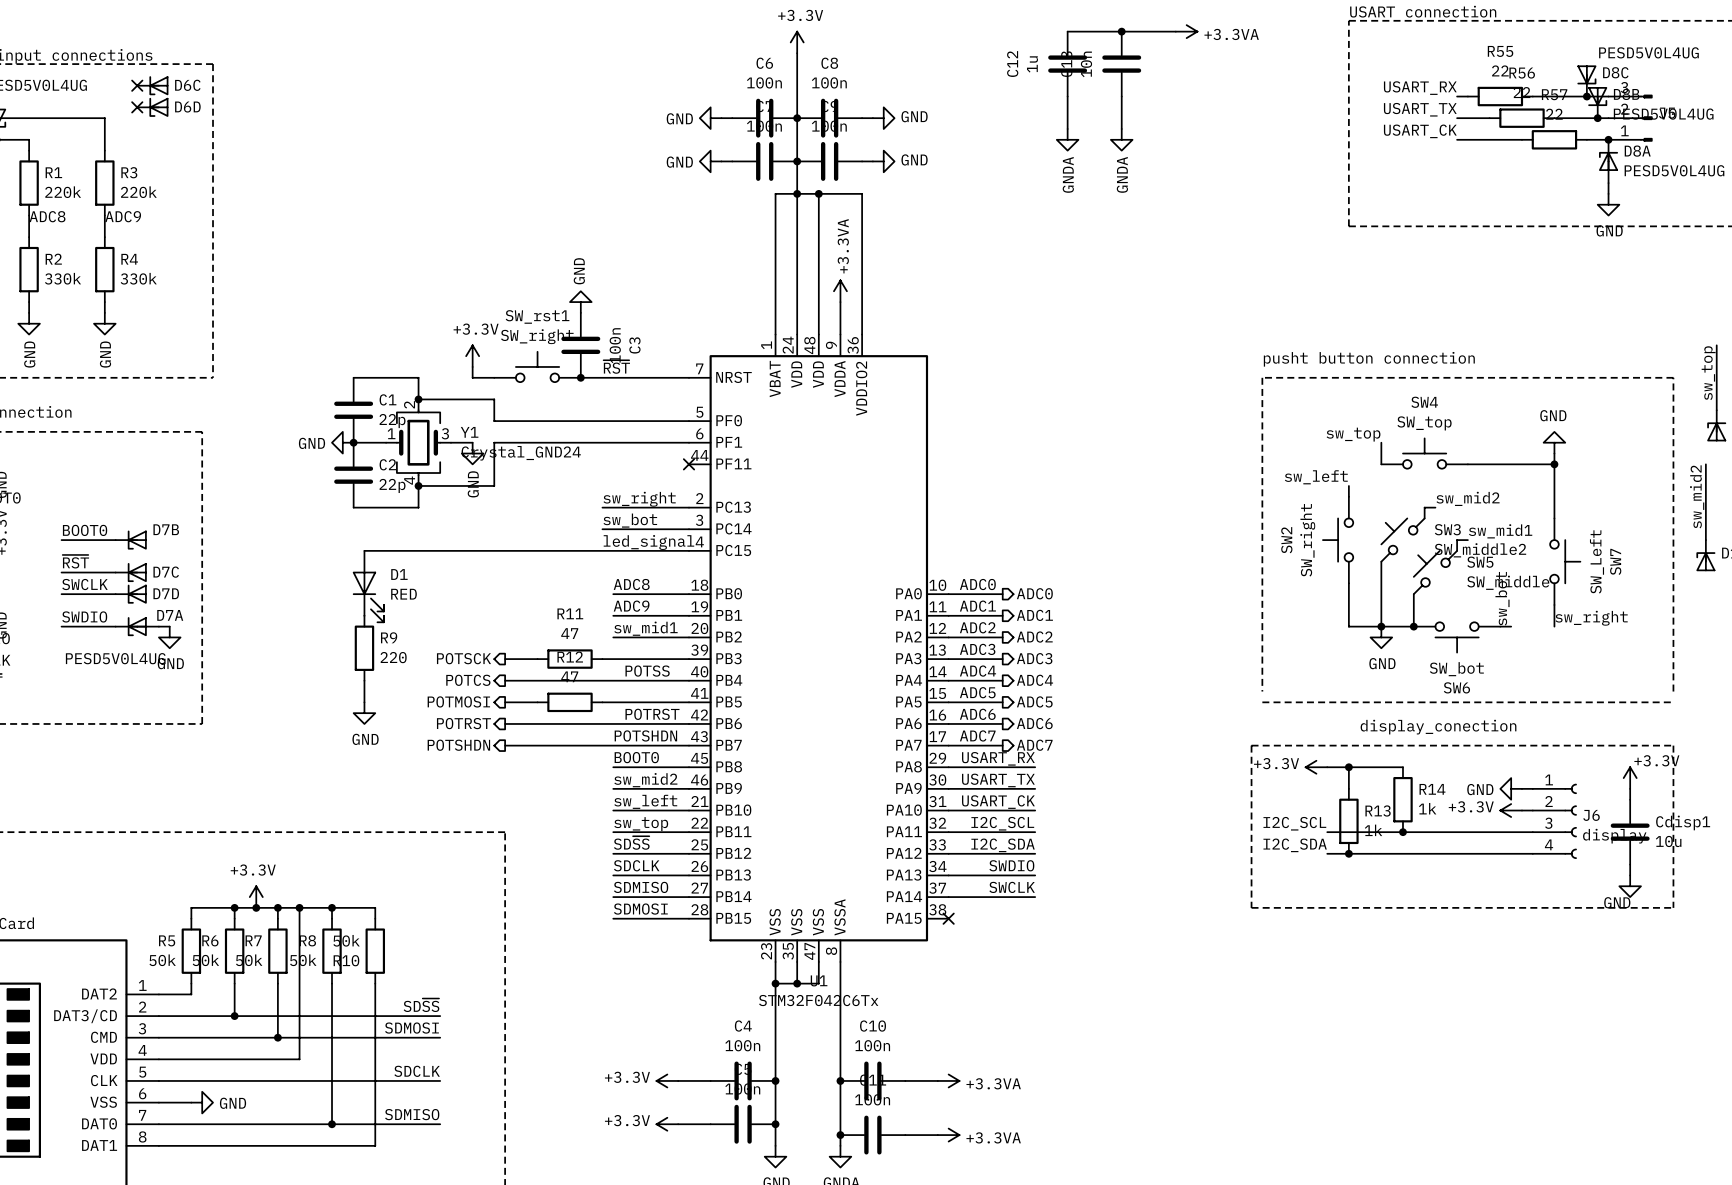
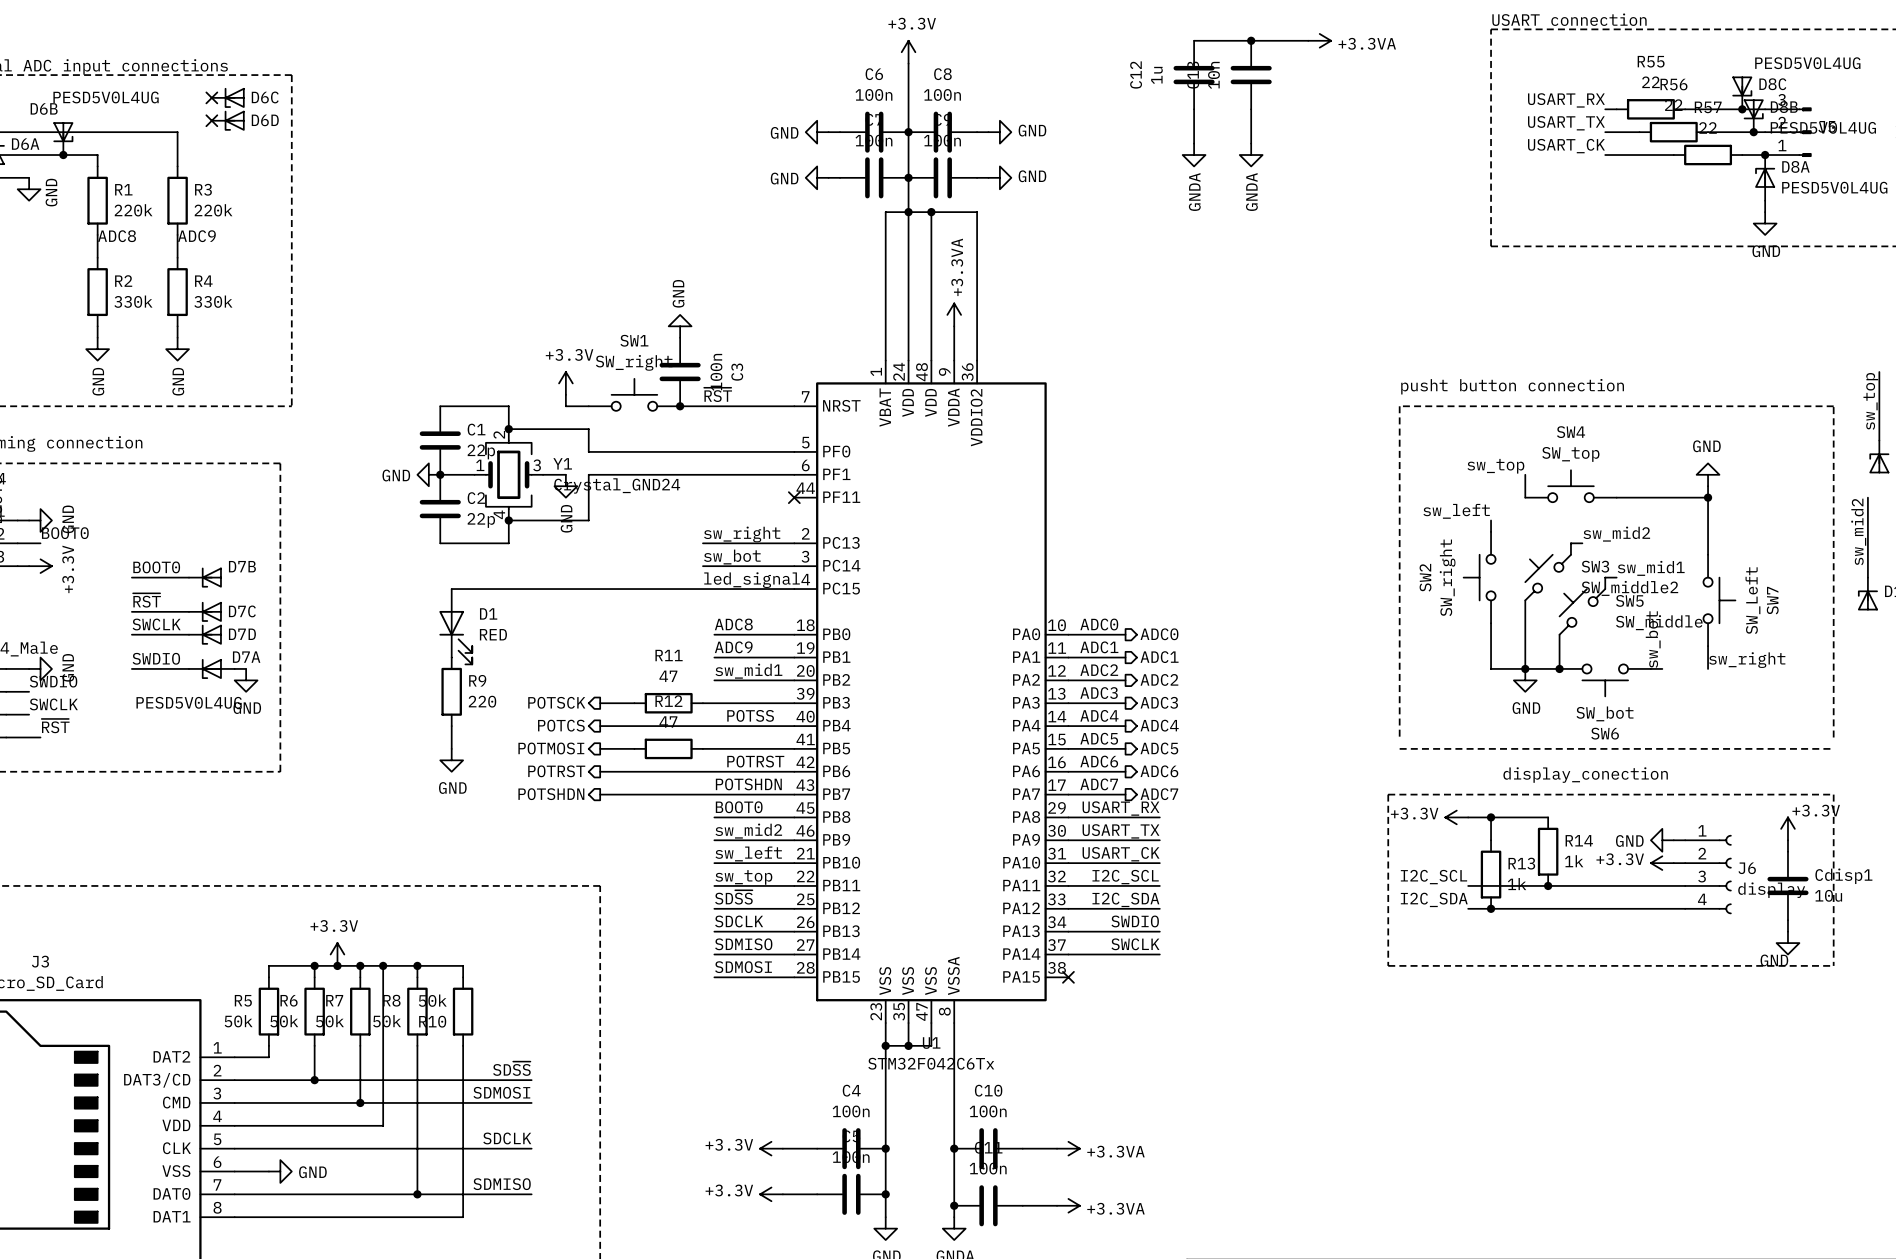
SW_rst1 name: SW_rst1 (537, 316) -> SW1 (634, 340)

